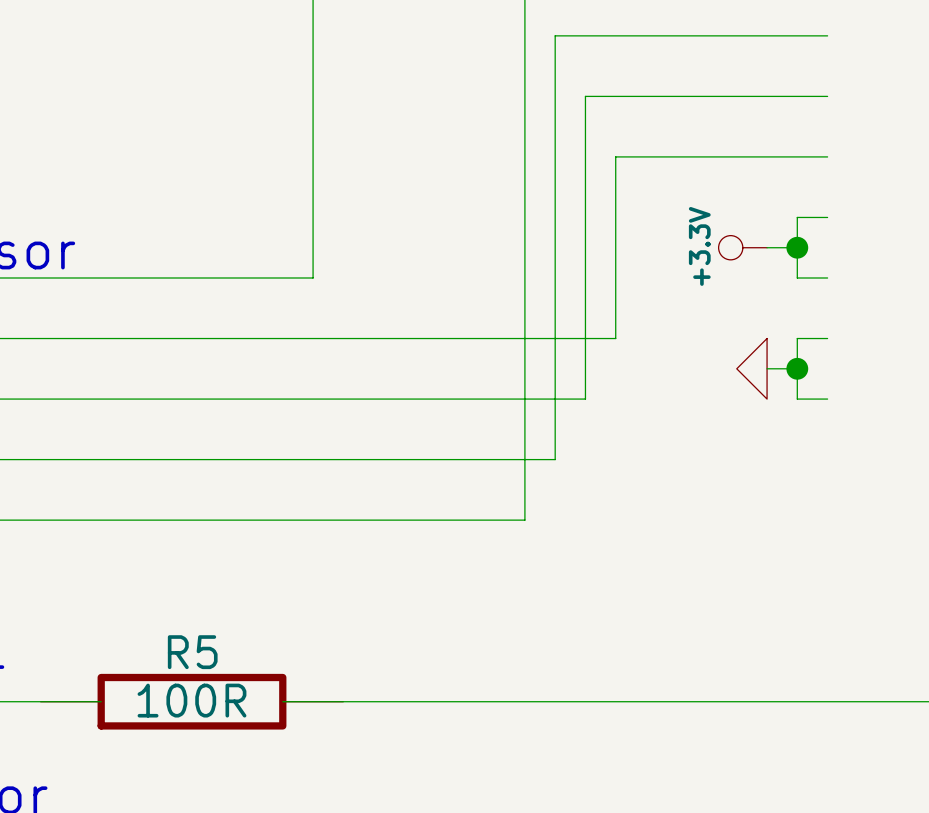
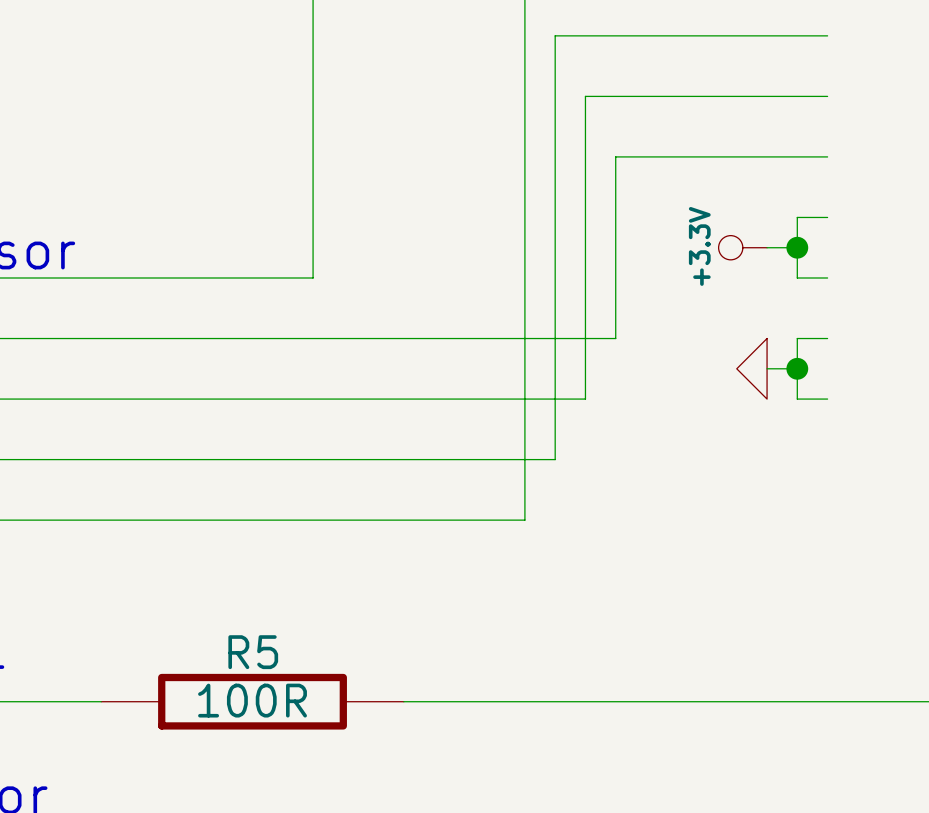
R5 position: (191, 701) -> (252, 701)

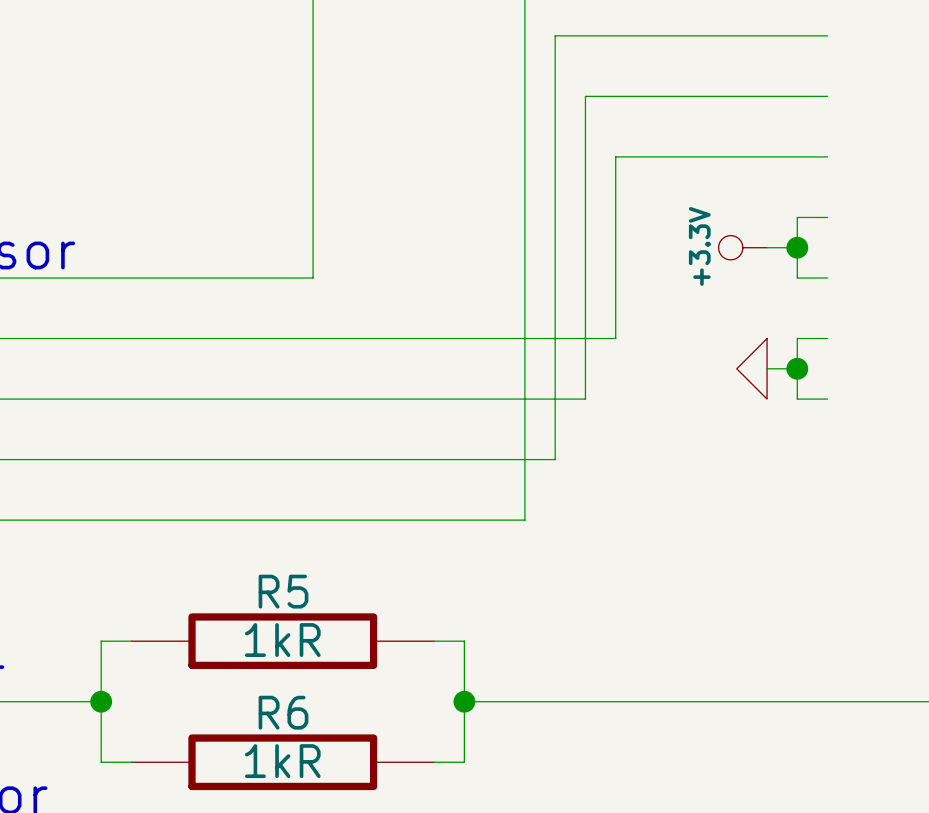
wire: none -> (131, 641) (101, 641) (101, 762) (131, 762)
wire: none -> (434, 641) (464, 641) (464, 762) (434, 762)
R5 value: 100R (252, 700) -> 1kR (282, 640)
junction: none -> (101, 701)
R5 position: (252, 701) -> (282, 641)
wire: (403, 701) (464, 701) -> none
junction: none -> (464, 701)
R6: none -> 1kR (282, 762)

